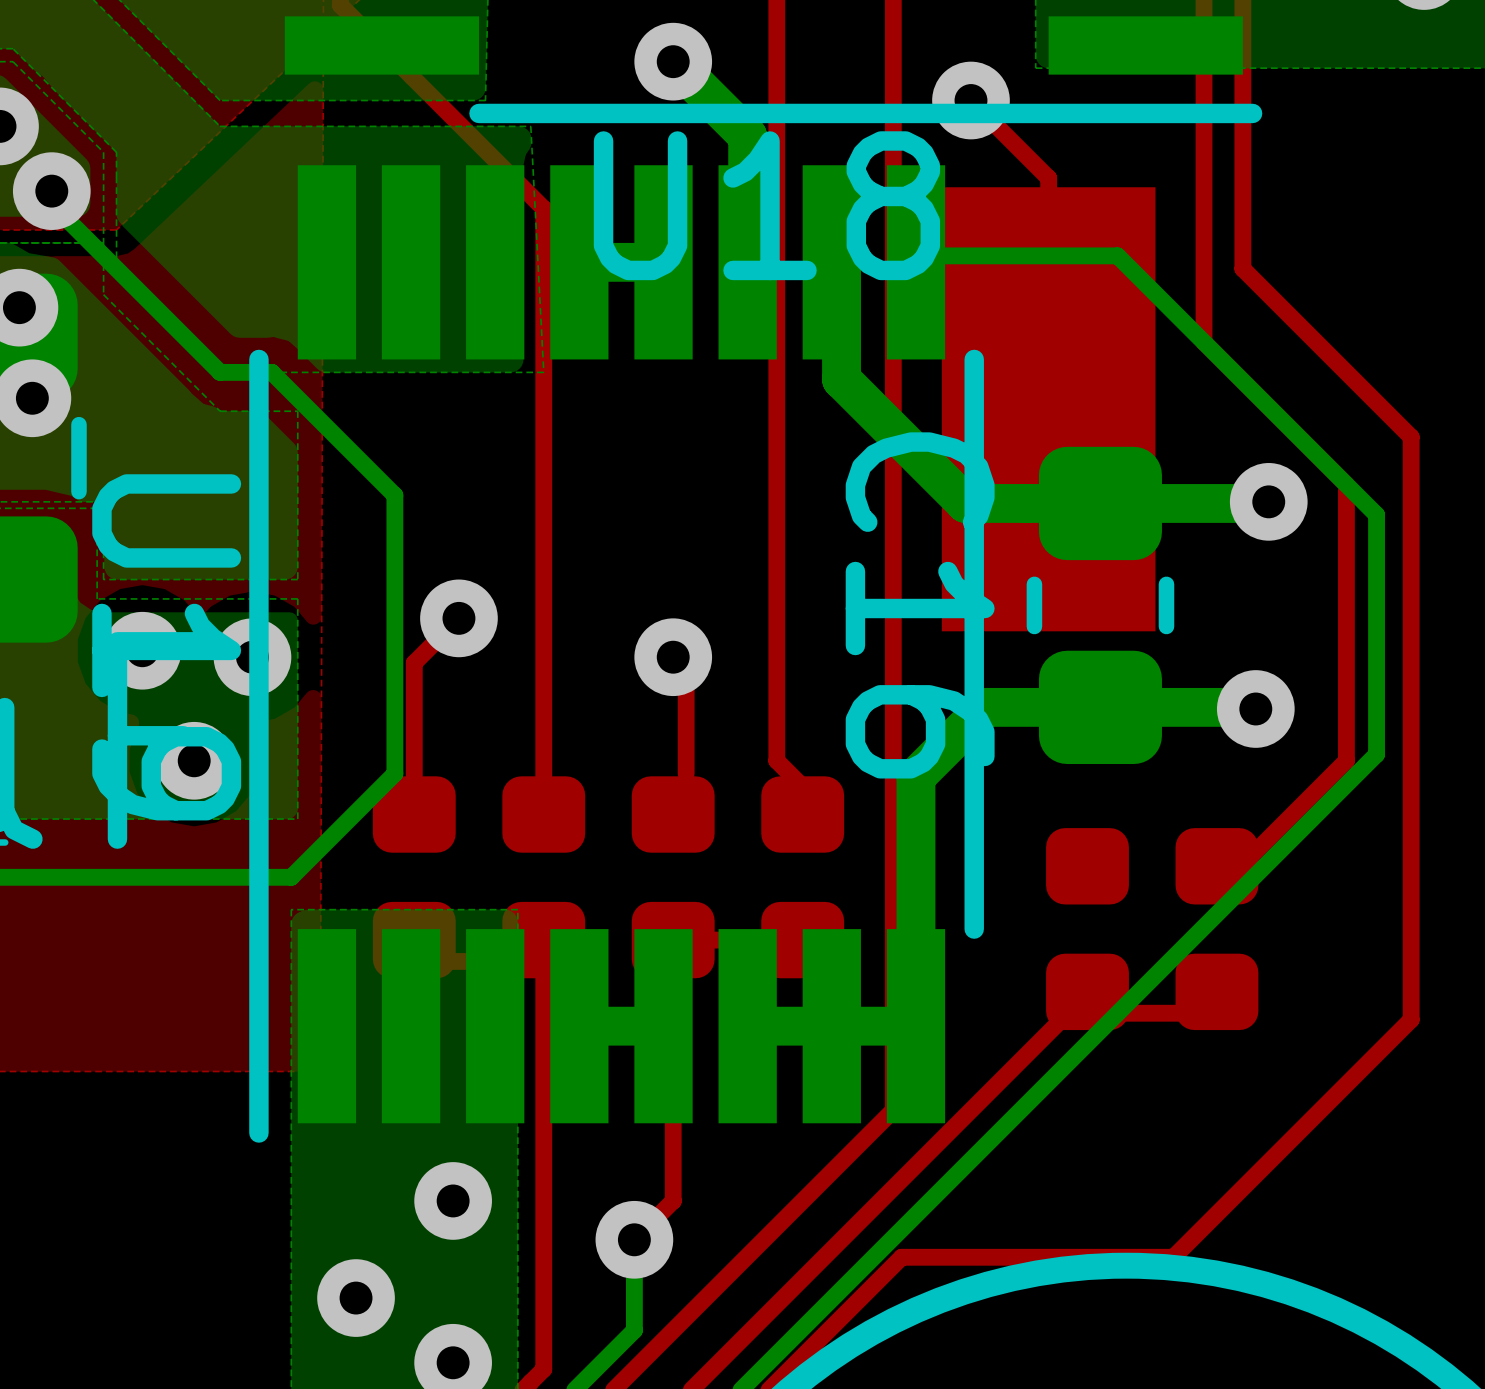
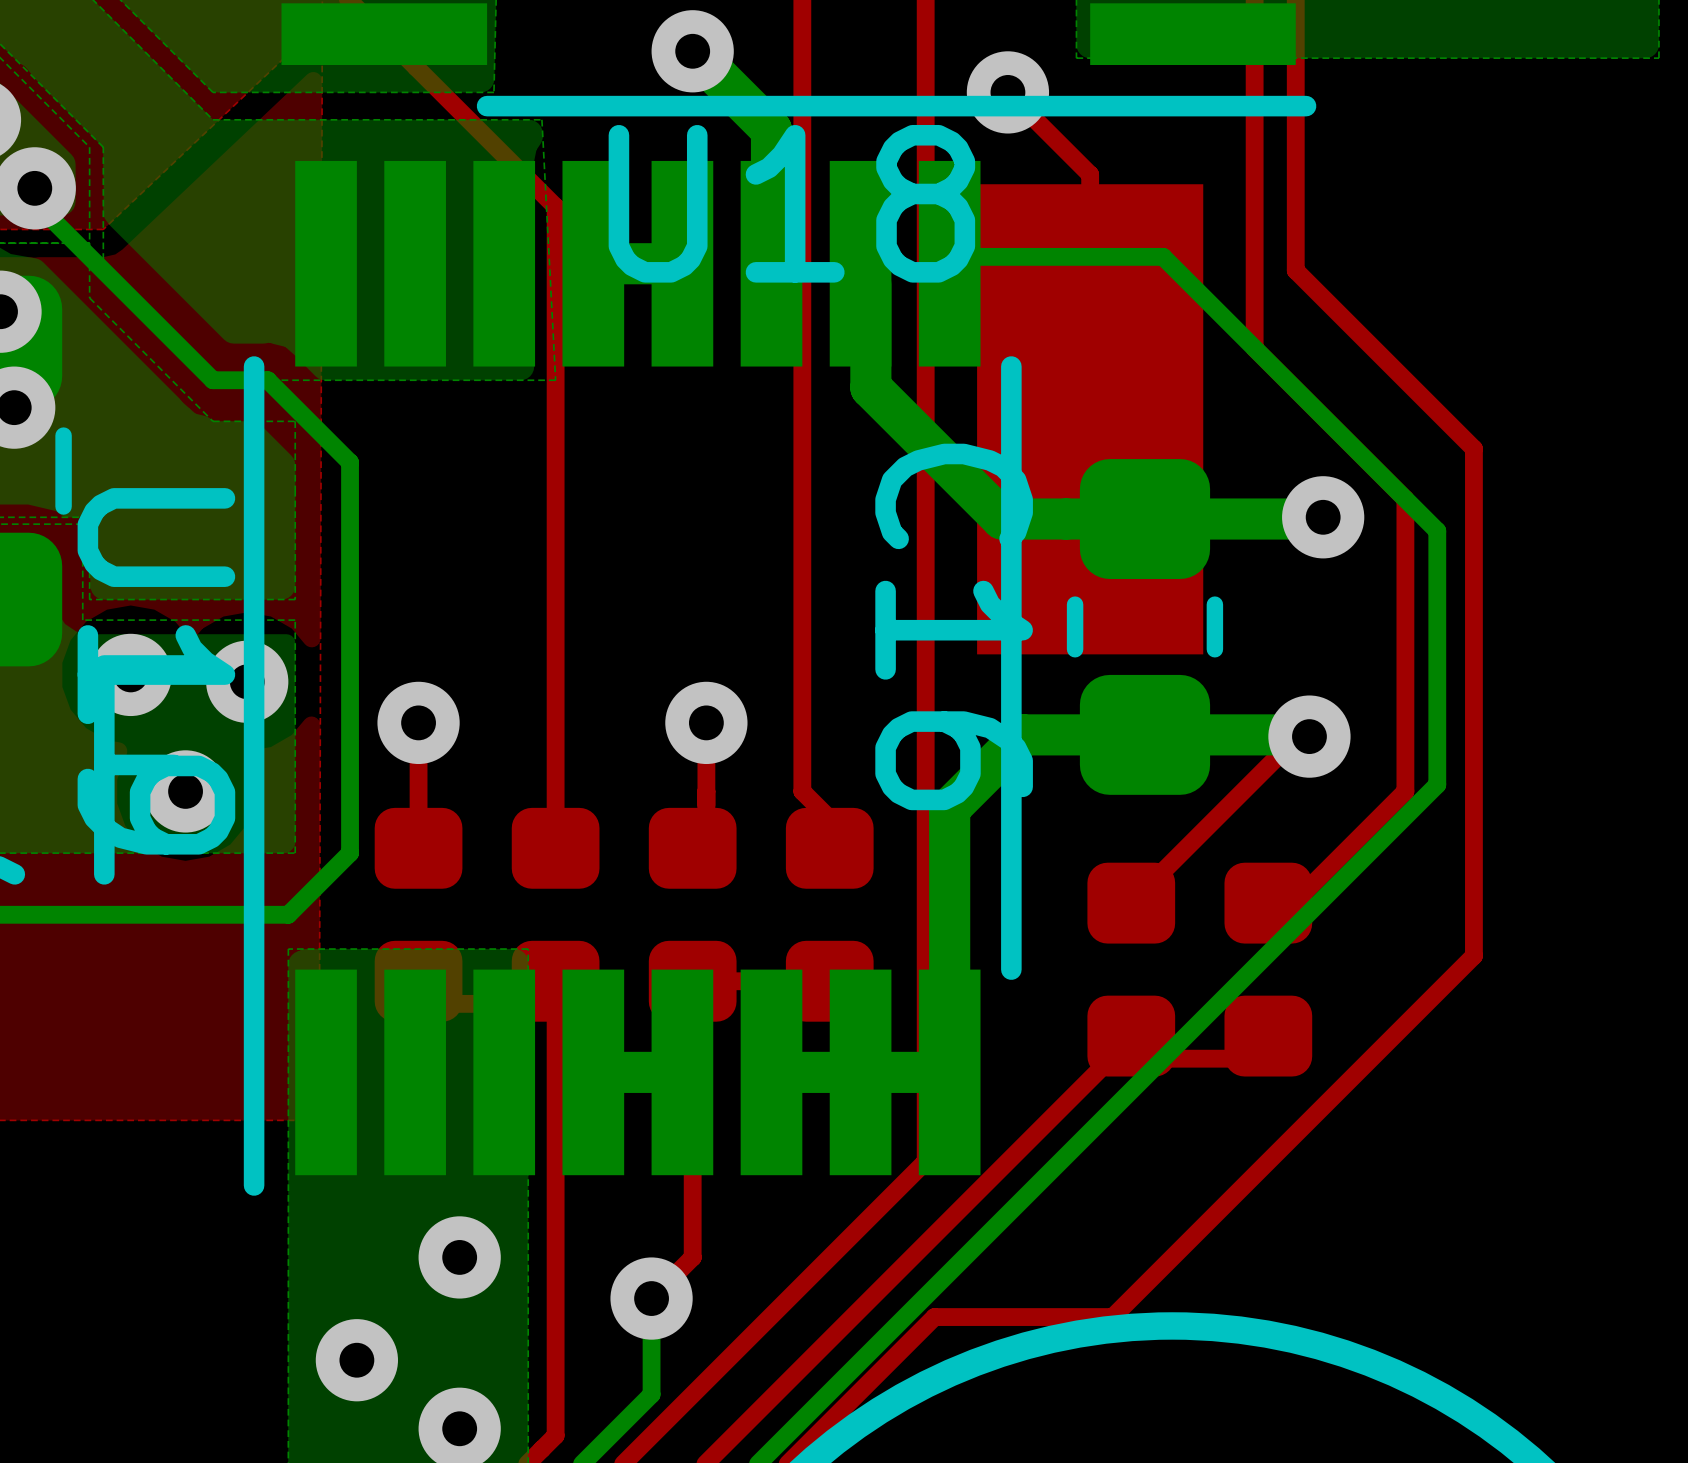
bottom track: (349, 450) (394, 495) (394, 773) (349, 819) -> (350, 462) (350, 853)
top track: (458, 618) (414, 663) (414, 696) -> none
via position: (458, 618) -> (418, 722)
via position: (673, 657) -> (706, 722)
top track: none -> (1309, 736) (1297, 736) (1131, 903)
top track: (1411, 916) (1411, 1019) (1173, 1257) (1070, 1257) -> (1473, 955) (1112, 1317)

